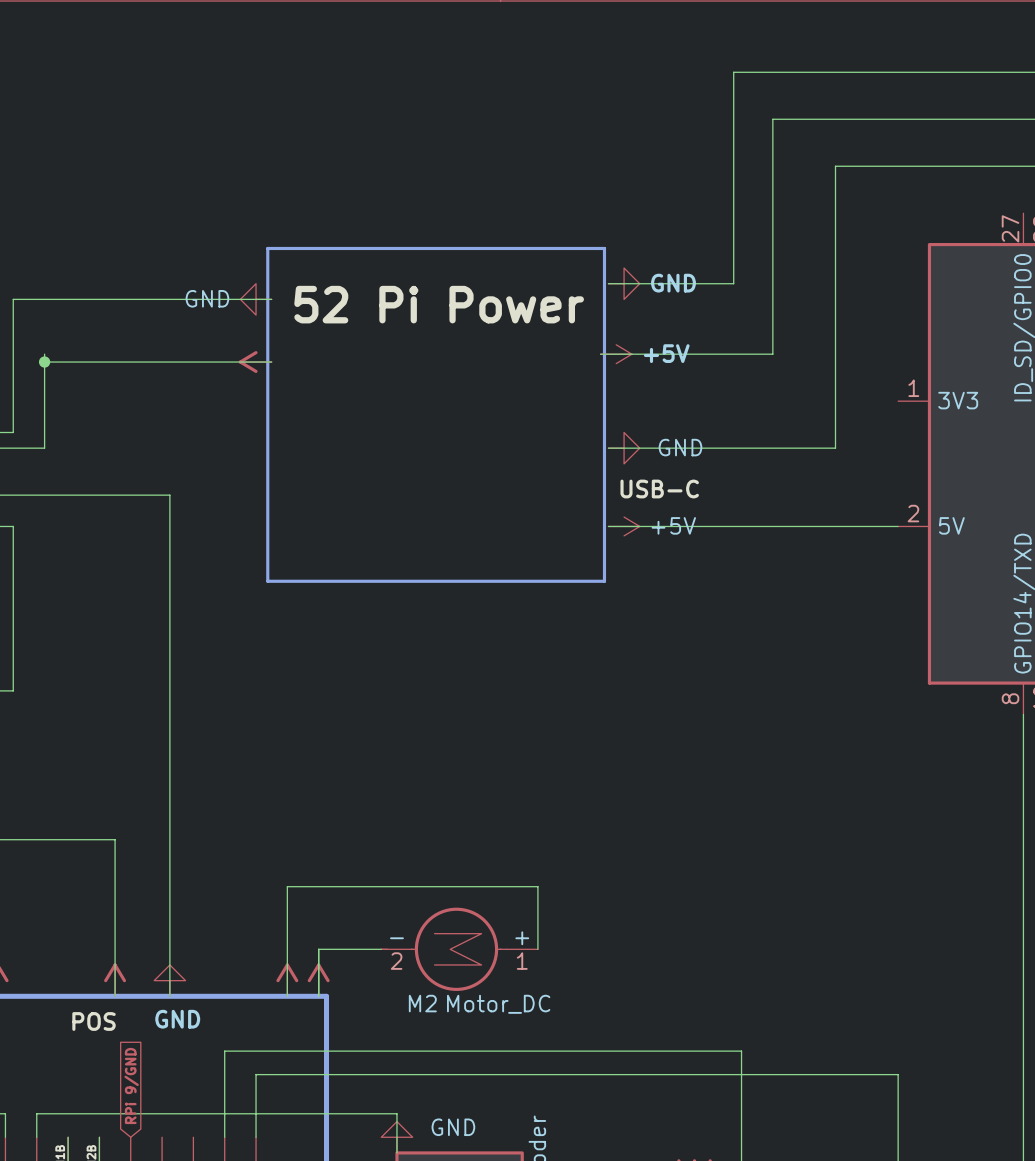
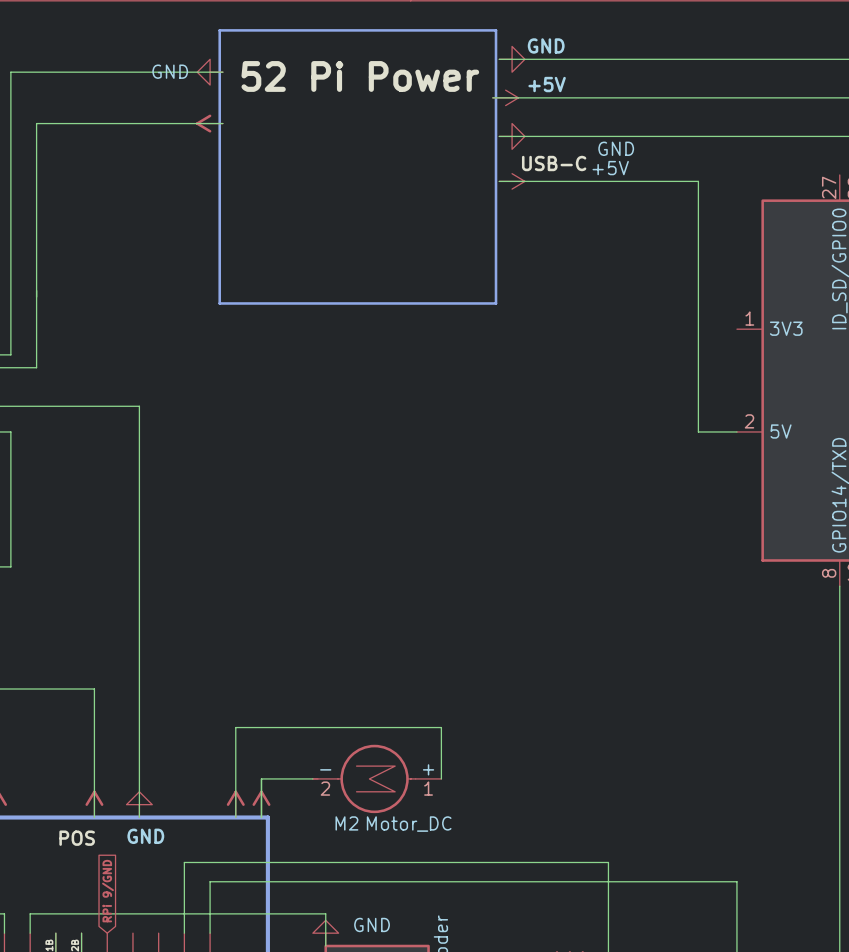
power symbol: none -> GND (512, 59)
wire: (733, 72) (733, 283) (608, 283) -> (602, 59) (499, 59)
power symbol: none -> GND (210, 72)
power symbol: none -> +5V (505, 97)
wire: (772, 119) (772, 354) (600, 354) -> (634, 97) (492, 97)
wire: none -> (222, 123) (36, 123) (36, 290)
power symbol: none -> GND (512, 136)
wire: (835, 166) (835, 448) (608, 448) -> (685, 136) (499, 136)
power symbol: none -> +5V (512, 181)
line: (267, 248) (604, 248) -> (219, 203) (219, 30) (496, 30) (496, 203)
power symbol: GND (624, 283) -> none
wire: (13, 299) (271, 299) -> (10, 245) (10, 72) (222, 72)
power symbol: GND (256, 299) -> none
label position: 52 Pi Power (439, 304) -> 52 Pi Power (360, 76)
power symbol: +5V (616, 354) -> none
wire: (44, 362) (271, 362) -> none
junction: (44, 362) -> none
power symbol position: (255, 362) -> (209, 123)
line: (267, 369) (267, 581) (604, 581) (604, 369) -> (219, 303) (496, 303)
power symbol: GND (624, 448) -> none
label position: USB-C (659, 489) -> USB-C (554, 163)
wire: (608, 526) (851, 526) -> (499, 181) (698, 181) (698, 431)
power symbol: +5V (624, 526) -> none

